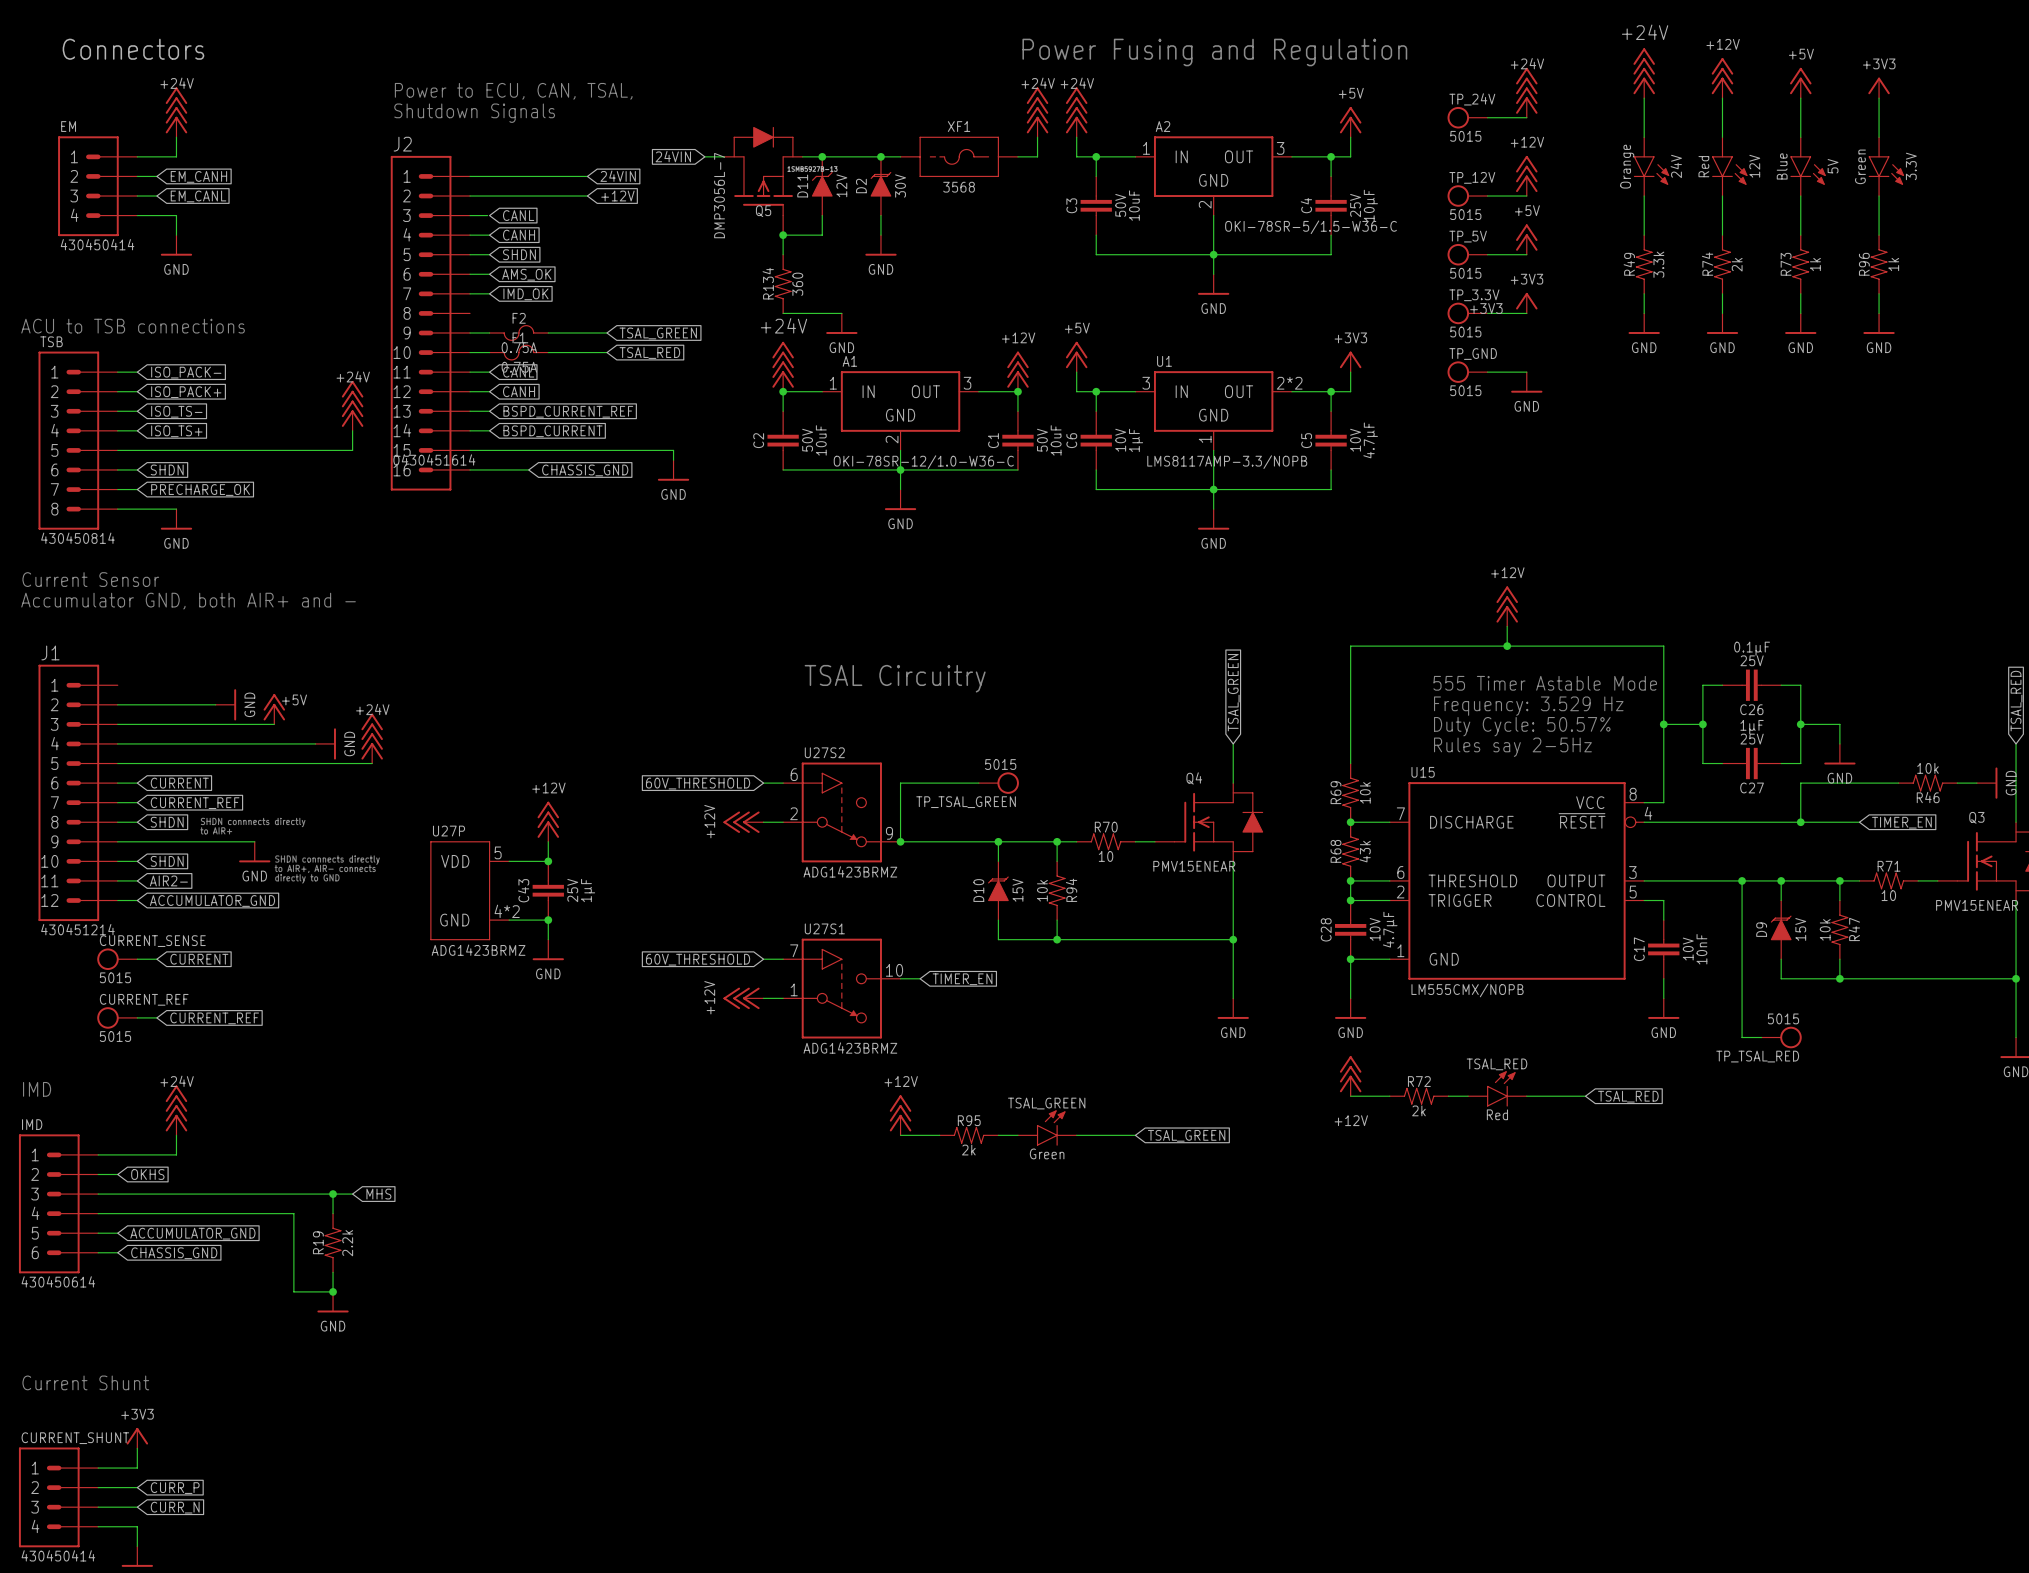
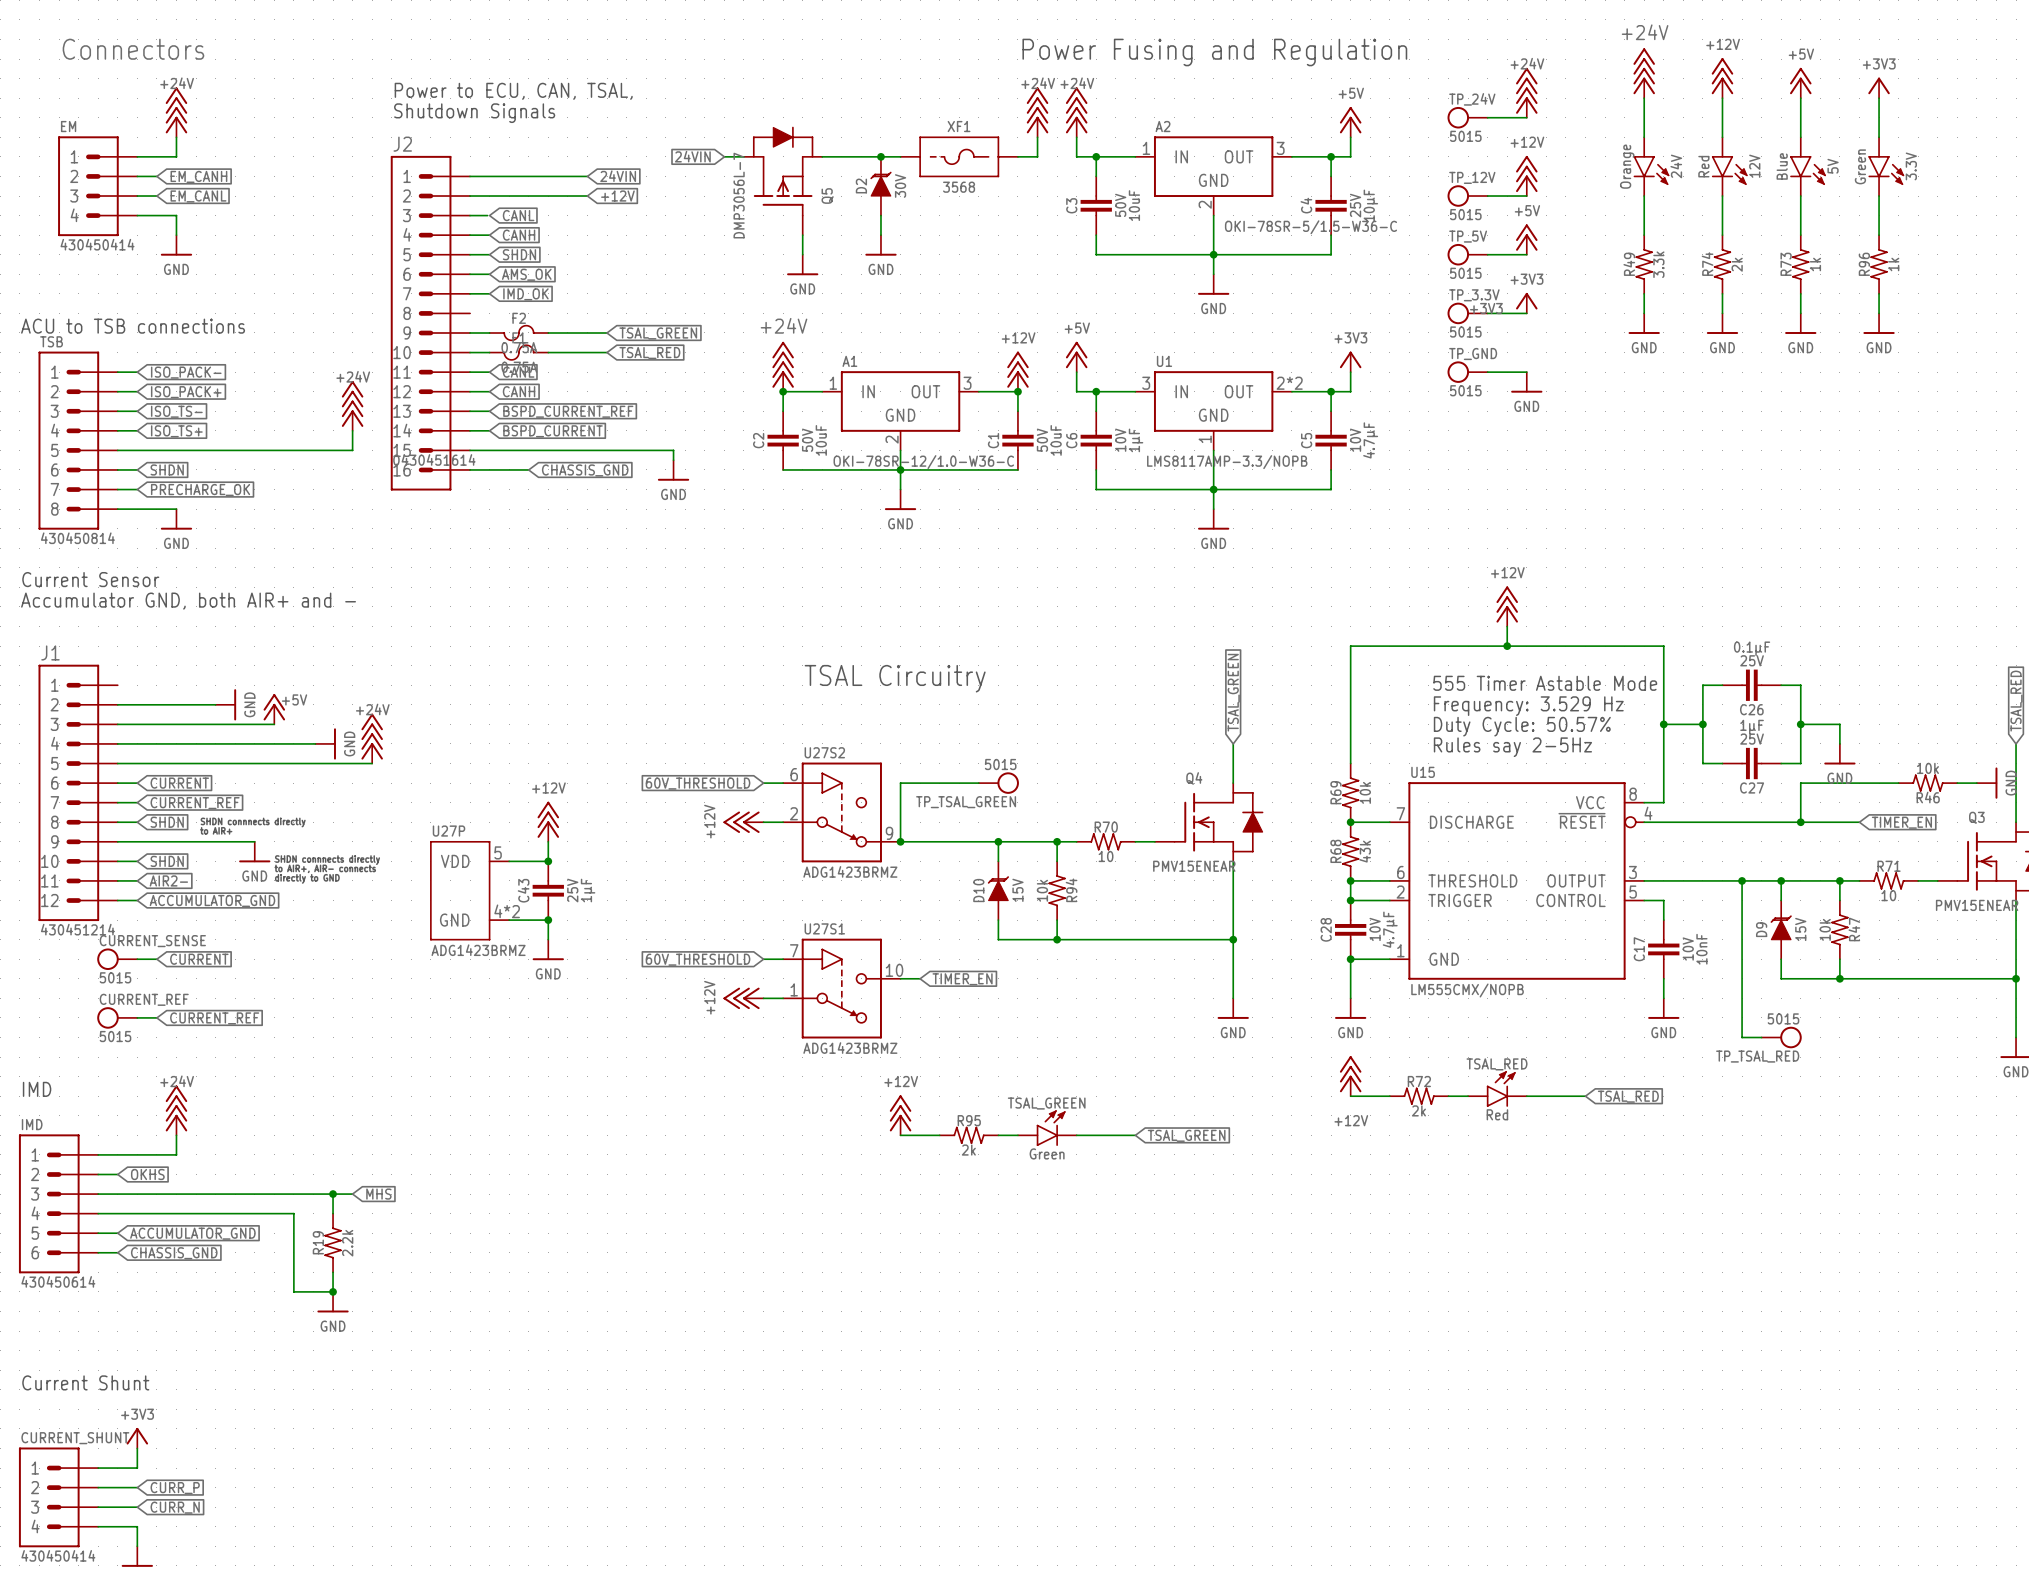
global label position: 24VIN (673, 156) -> 24VIN (692, 156)
junction: (822, 156) -> none
Q5 position: (763, 181) -> (783, 181)
D11: (822, 186) -> none
Q5 name rotation: 0° (763, 211) -> 90° counterclockwise (827, 196)
Q5 name position: Q5 (763, 211) -> Q5 (827, 196)
wire: (822, 215) (822, 235) (783, 235) (783, 254) -> none
junction: (783, 235) -> none
wire: none -> (802, 235) (802, 254)
R134: (783, 284) -> none
wire: (783, 313) (841, 313) -> none
power symbol position: GND (841, 323) -> GND (802, 264)

